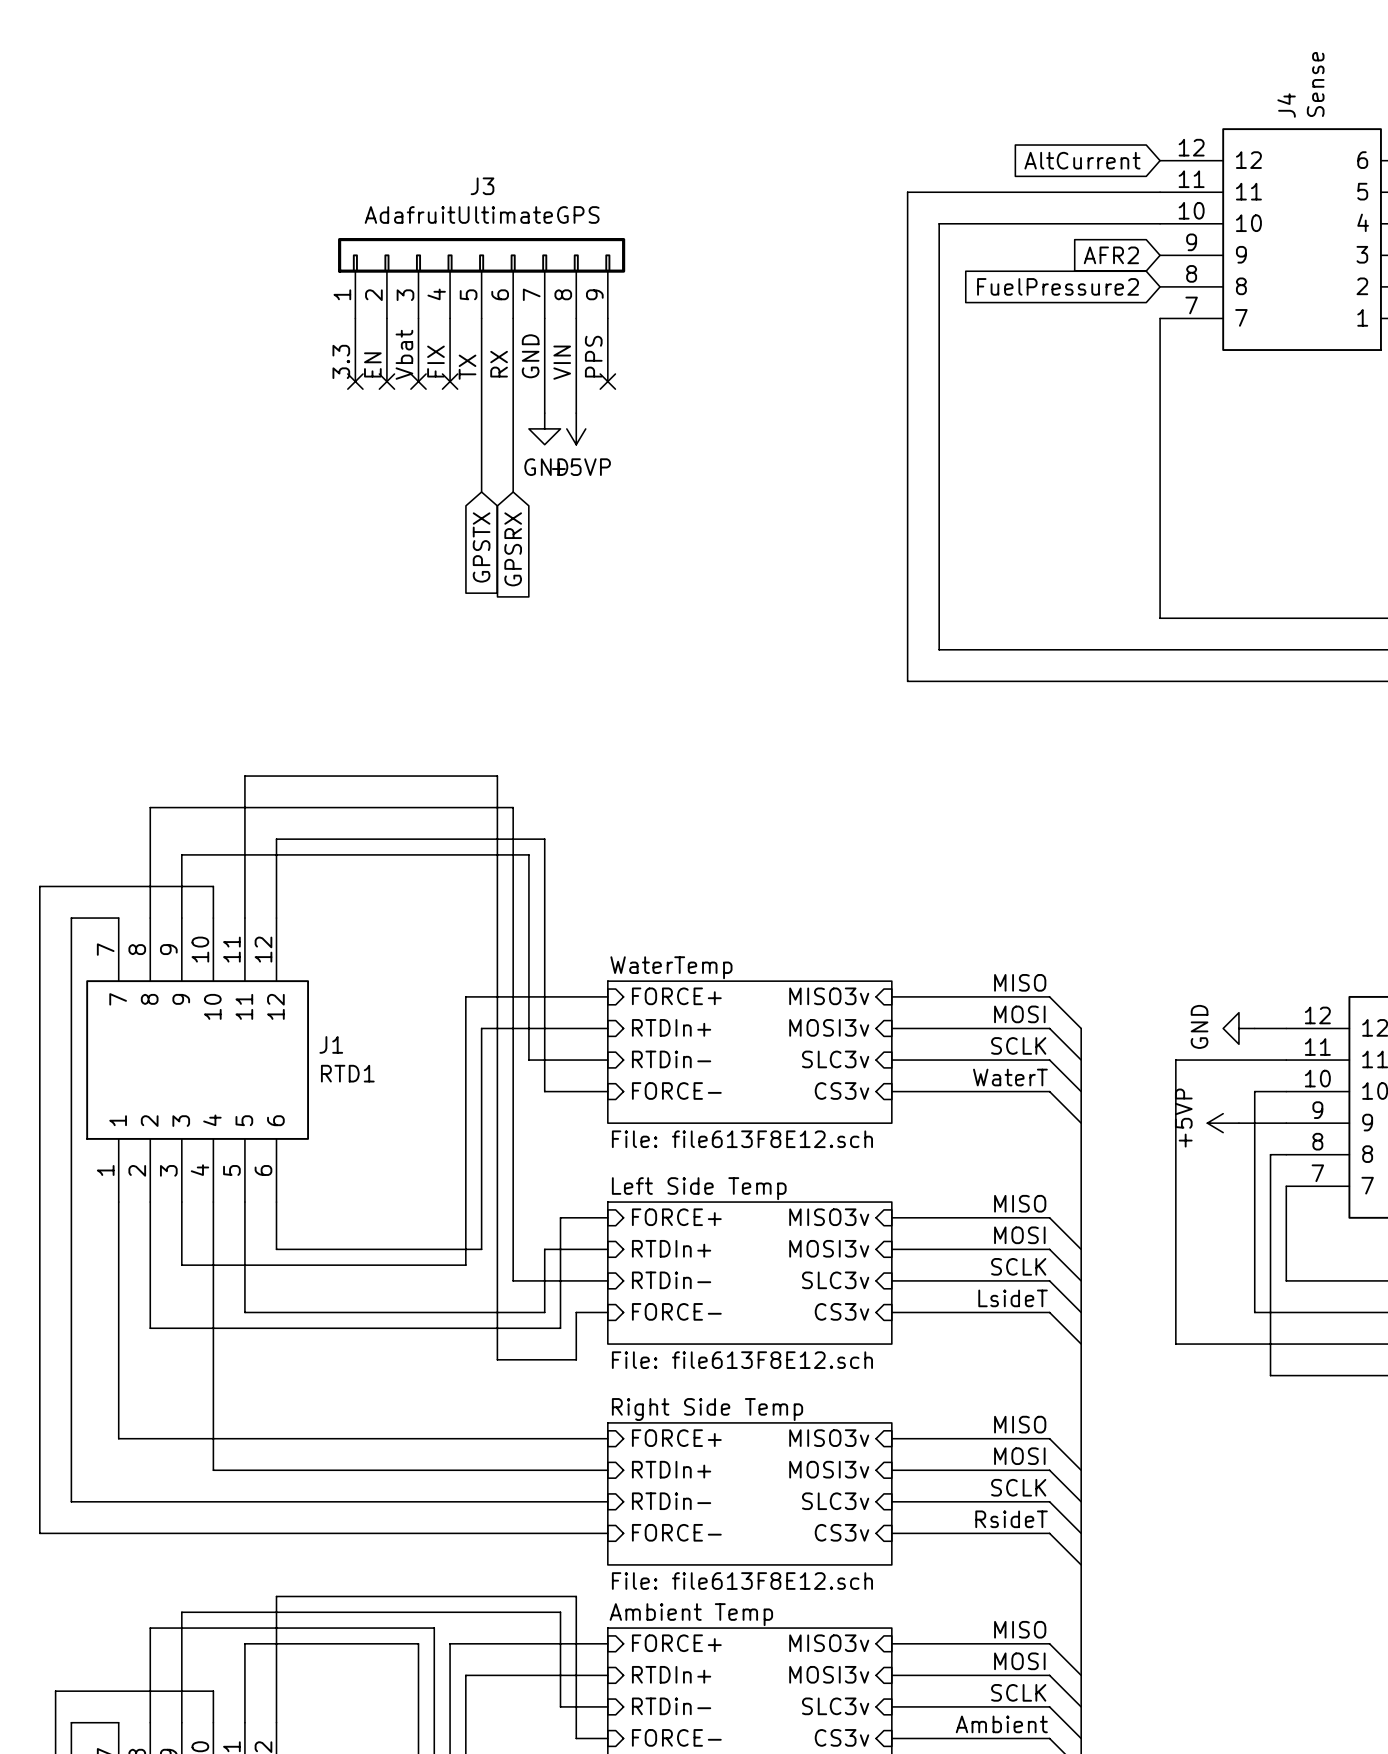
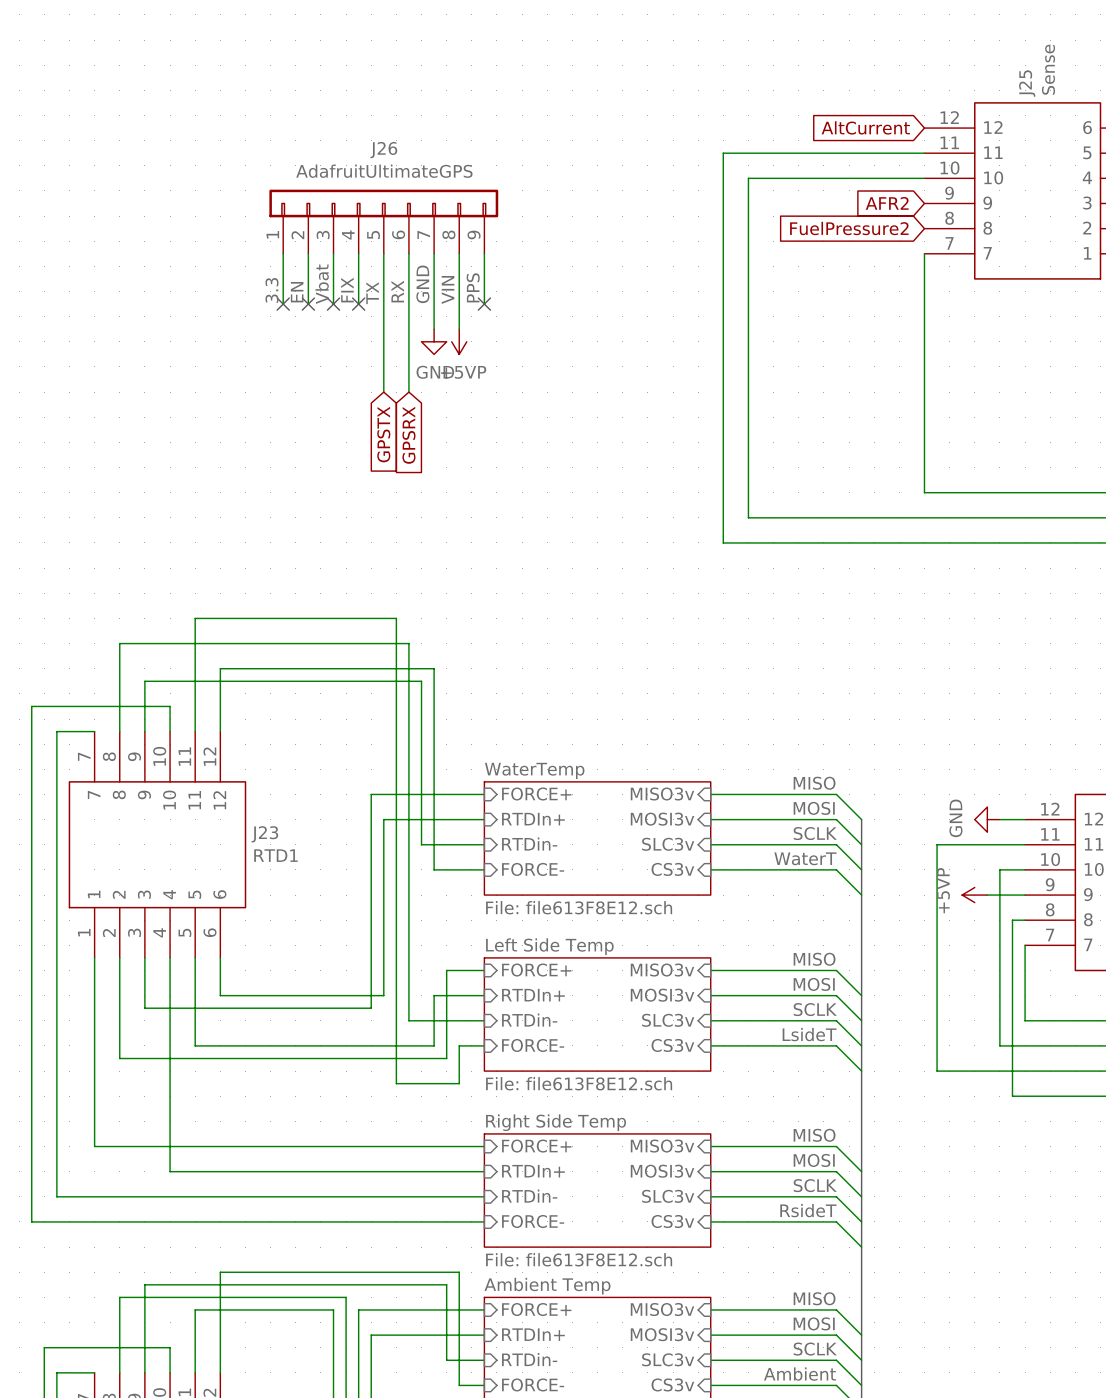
J4 name: J4 (1286, 105) -> J25 (1027, 83)
J3 name: J3 (482, 186) -> J26 (383, 150)
J1 name: J1 (331, 1044) -> J23 (264, 834)

